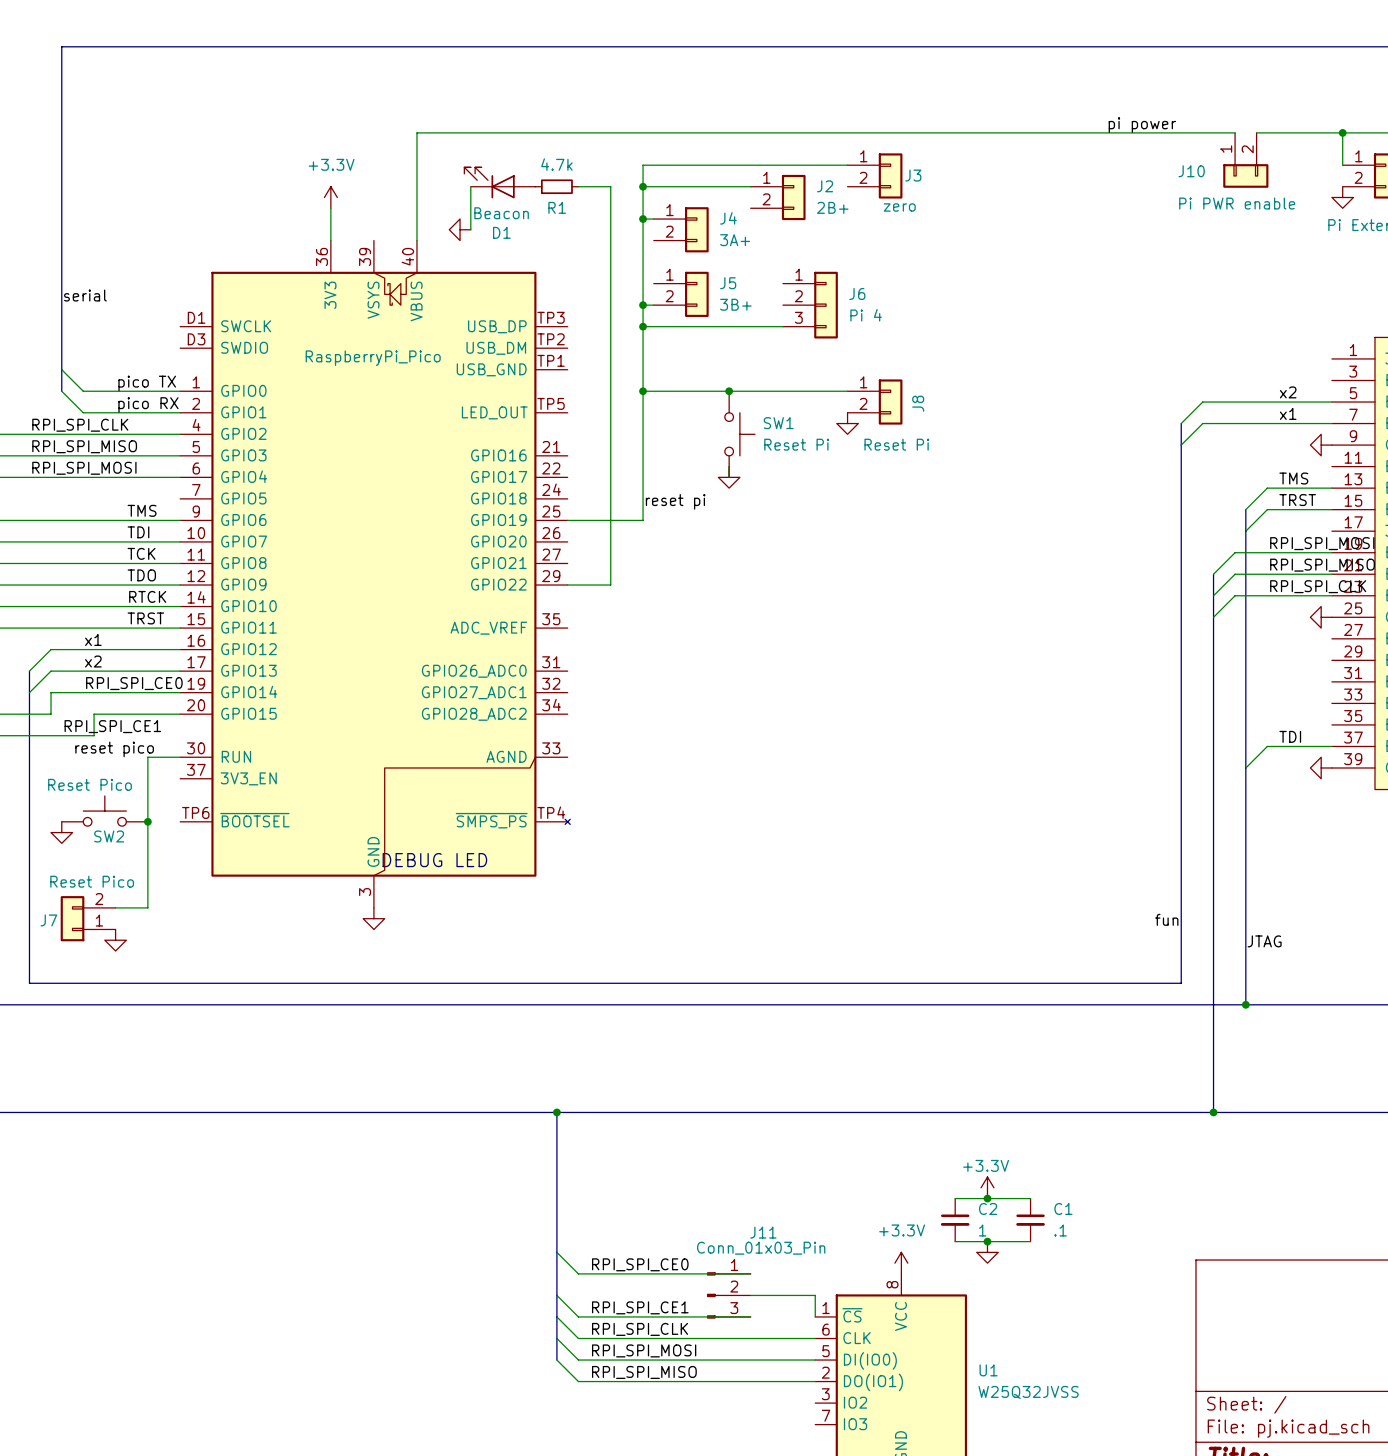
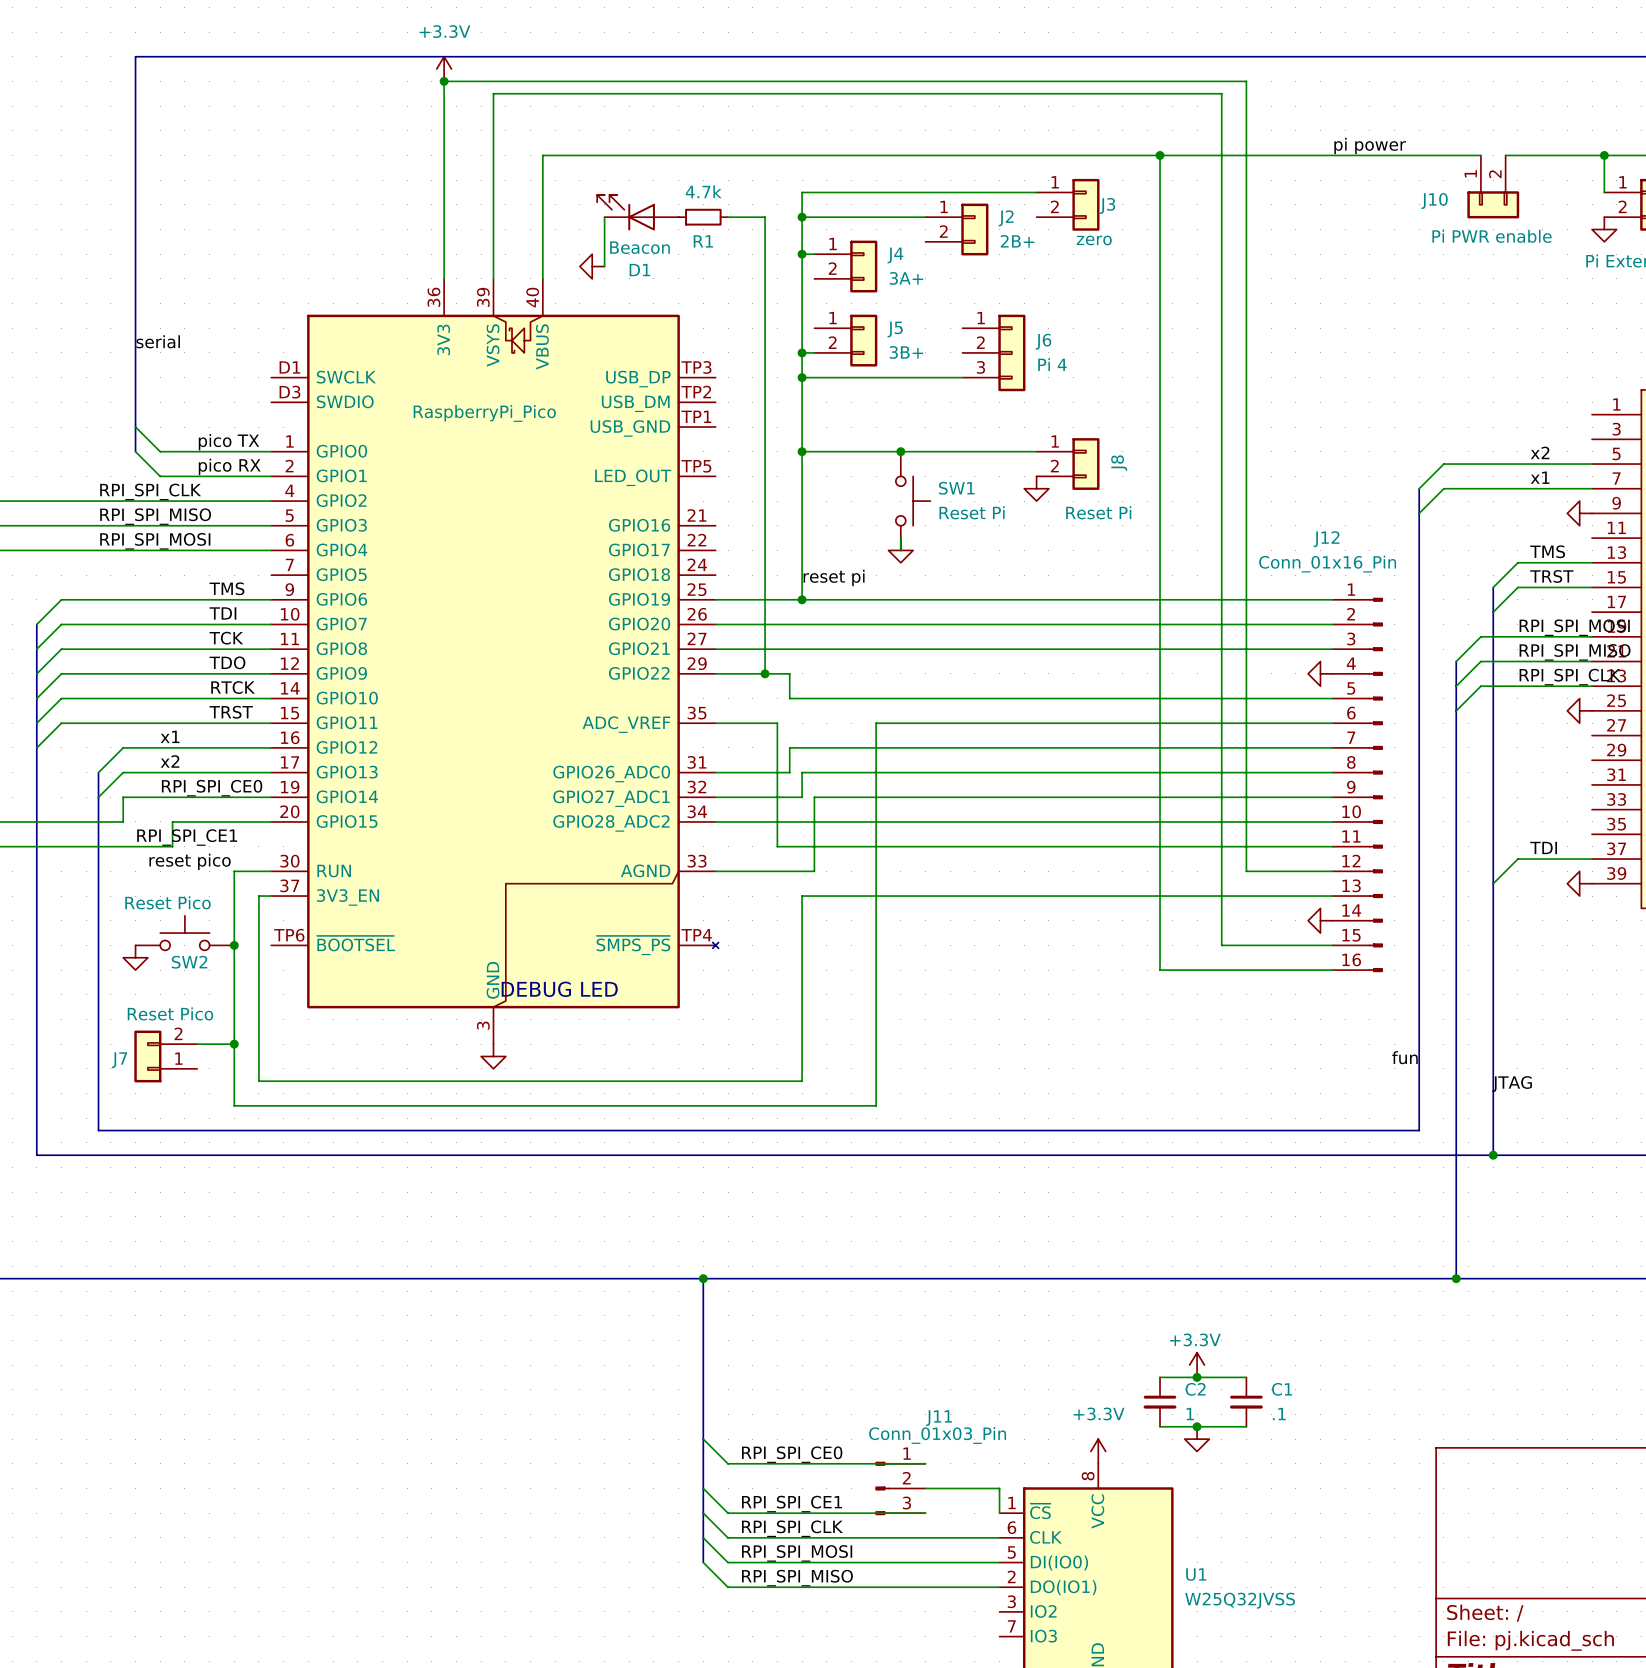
junction: none -> (444, 81)
wire: none -> (1160, 155) (1160, 970) (1332, 970)
junction: none -> (1160, 155)
power symbol position: +3.3V (330, 197) -> +3.3V (444, 69)
wire: none -> (444, 241) (444, 81) (1246, 81) (1246, 871) (1332, 871)
wire: none -> (493, 278) (493, 93) (1221, 93) (1221, 945) (1332, 945)
wire: none -> (802, 599) (1332, 599)
junction: none -> (802, 599)
wire: none -> (715, 624) (1332, 624)
wire: none -> (715, 649) (1332, 649)
wire: none -> (765, 673) (789, 673) (789, 698) (1332, 698)
junction: none -> (765, 673)
power symbol: none -> (1320, 673)
wire: none -> (715, 723) (777, 723) (777, 846) (1332, 846)
wire: none -> (1332, 723) (876, 723) (876, 1105) (234, 1105) (234, 1044)
wire: none -> (1332, 747) (789, 747) (789, 772) (715, 772)
wire: none -> (1332, 772) (802, 772) (802, 797) (715, 797)
J12: none -> Conn_01x16_Pin (1357, 784)
wire: none -> (1332, 797) (814, 797) (814, 871) (715, 871)
wire: none -> (715, 821) (1332, 821)
wire: none -> (271, 896) (258, 896) (258, 1081) (802, 1081) (802, 896) (1332, 896)
power symbol: none -> (1320, 920)
junction: none -> (234, 1044)
power symbol: (115, 940) -> none

